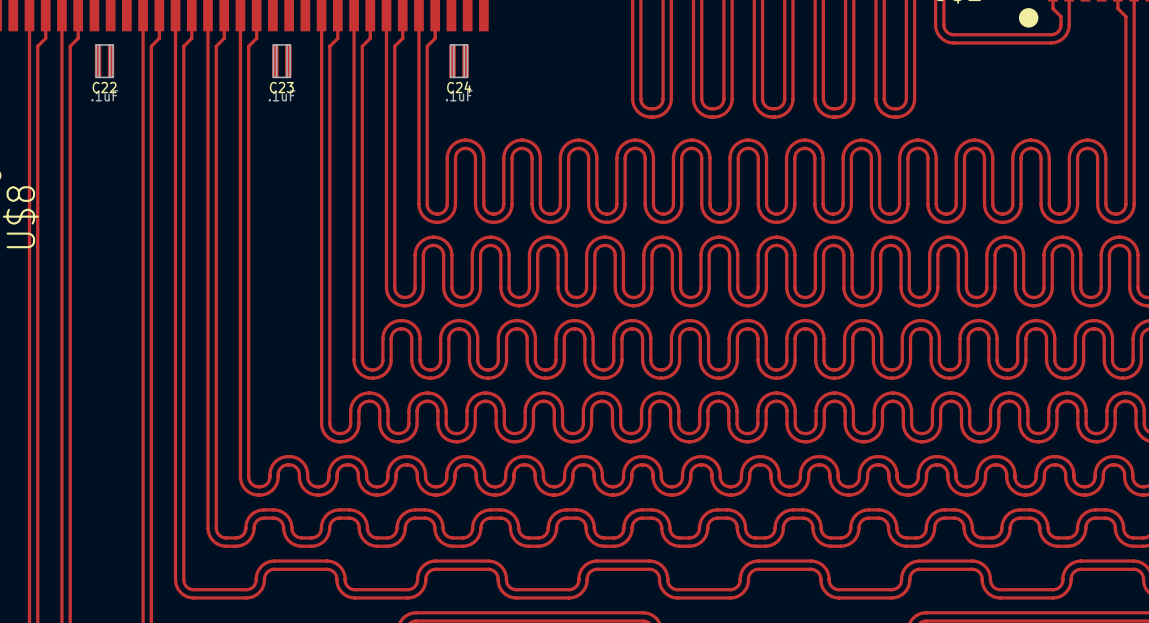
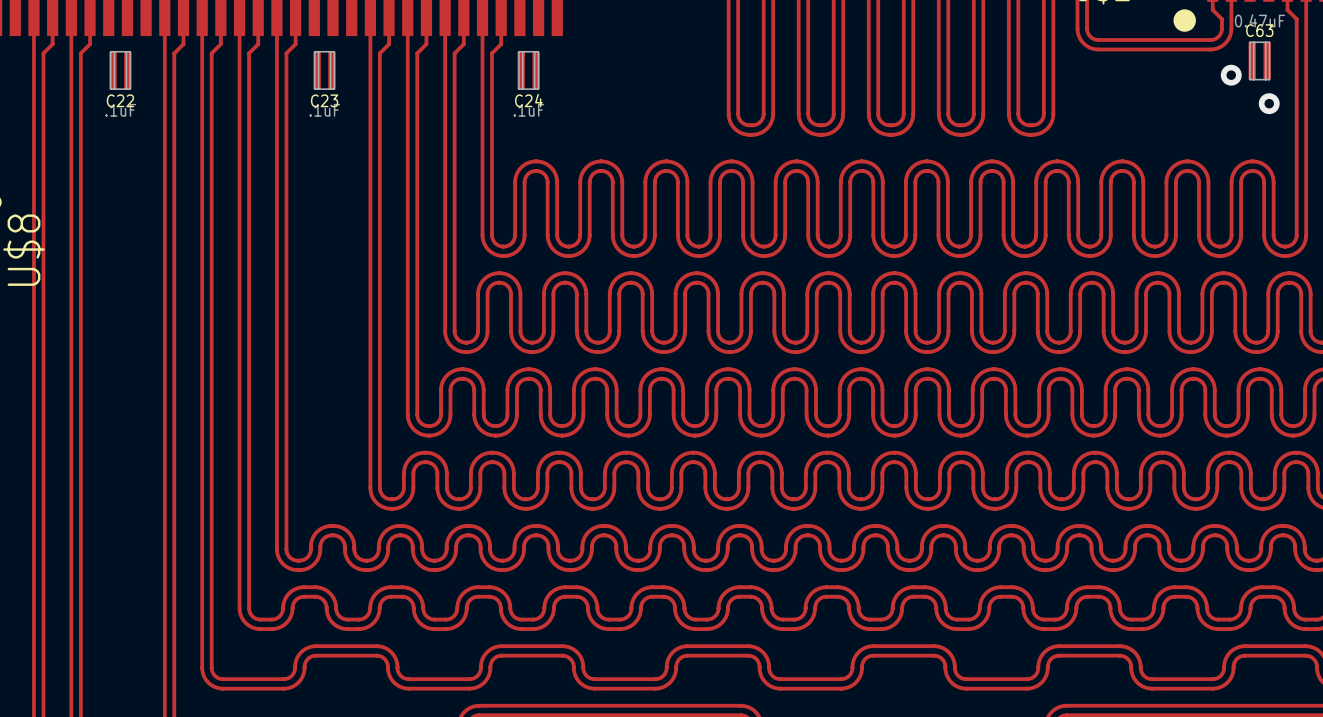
C63: none -> 0.47uF (1259, 60)
via: none -> (1231, 75)
via: none -> (1269, 103)

